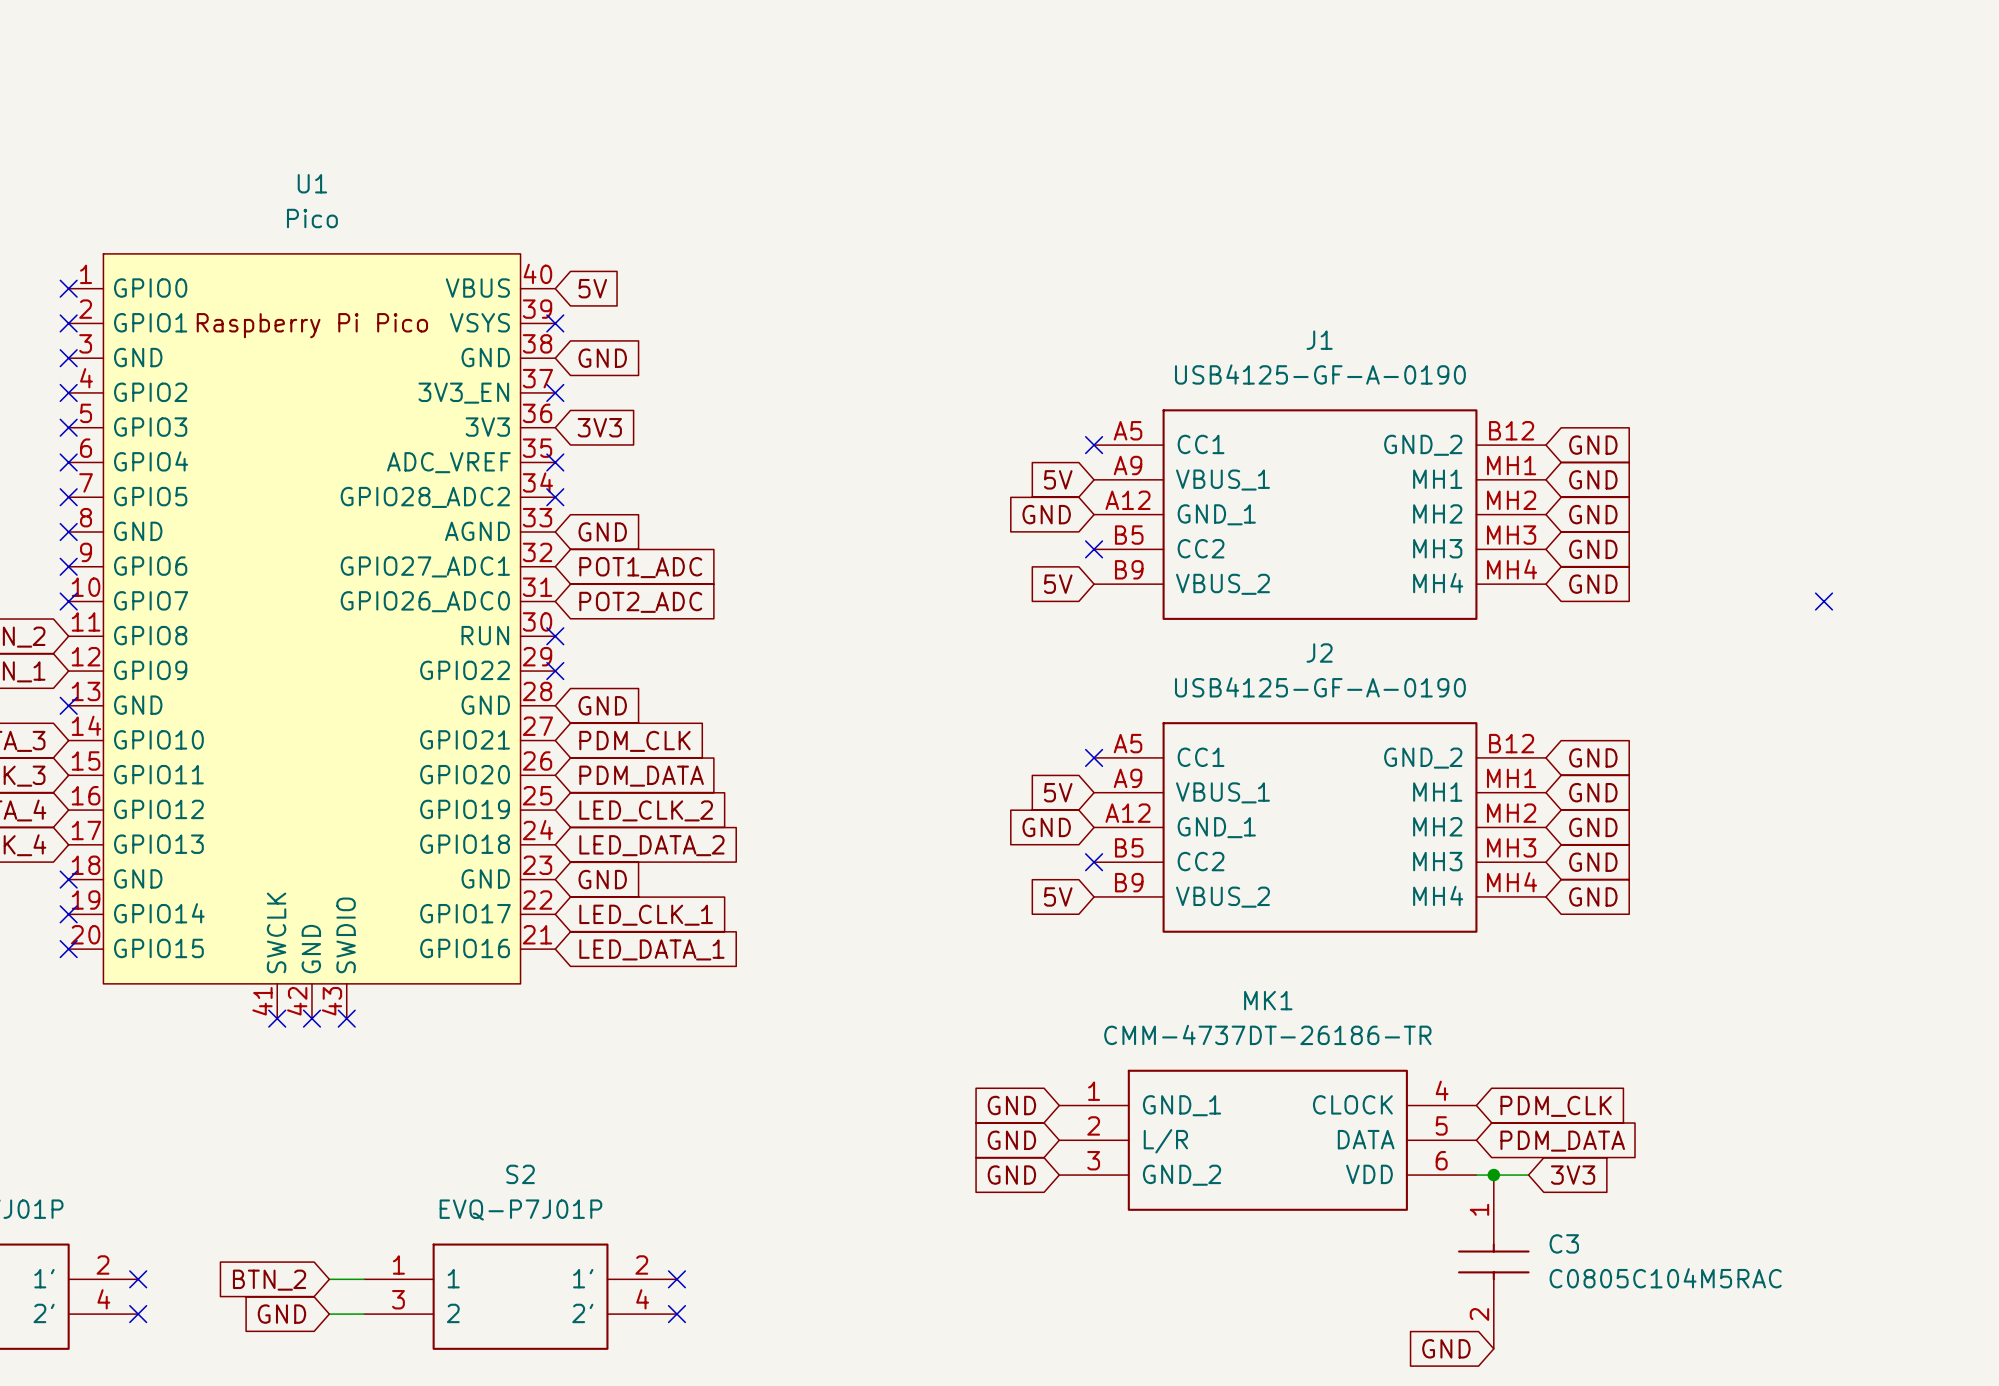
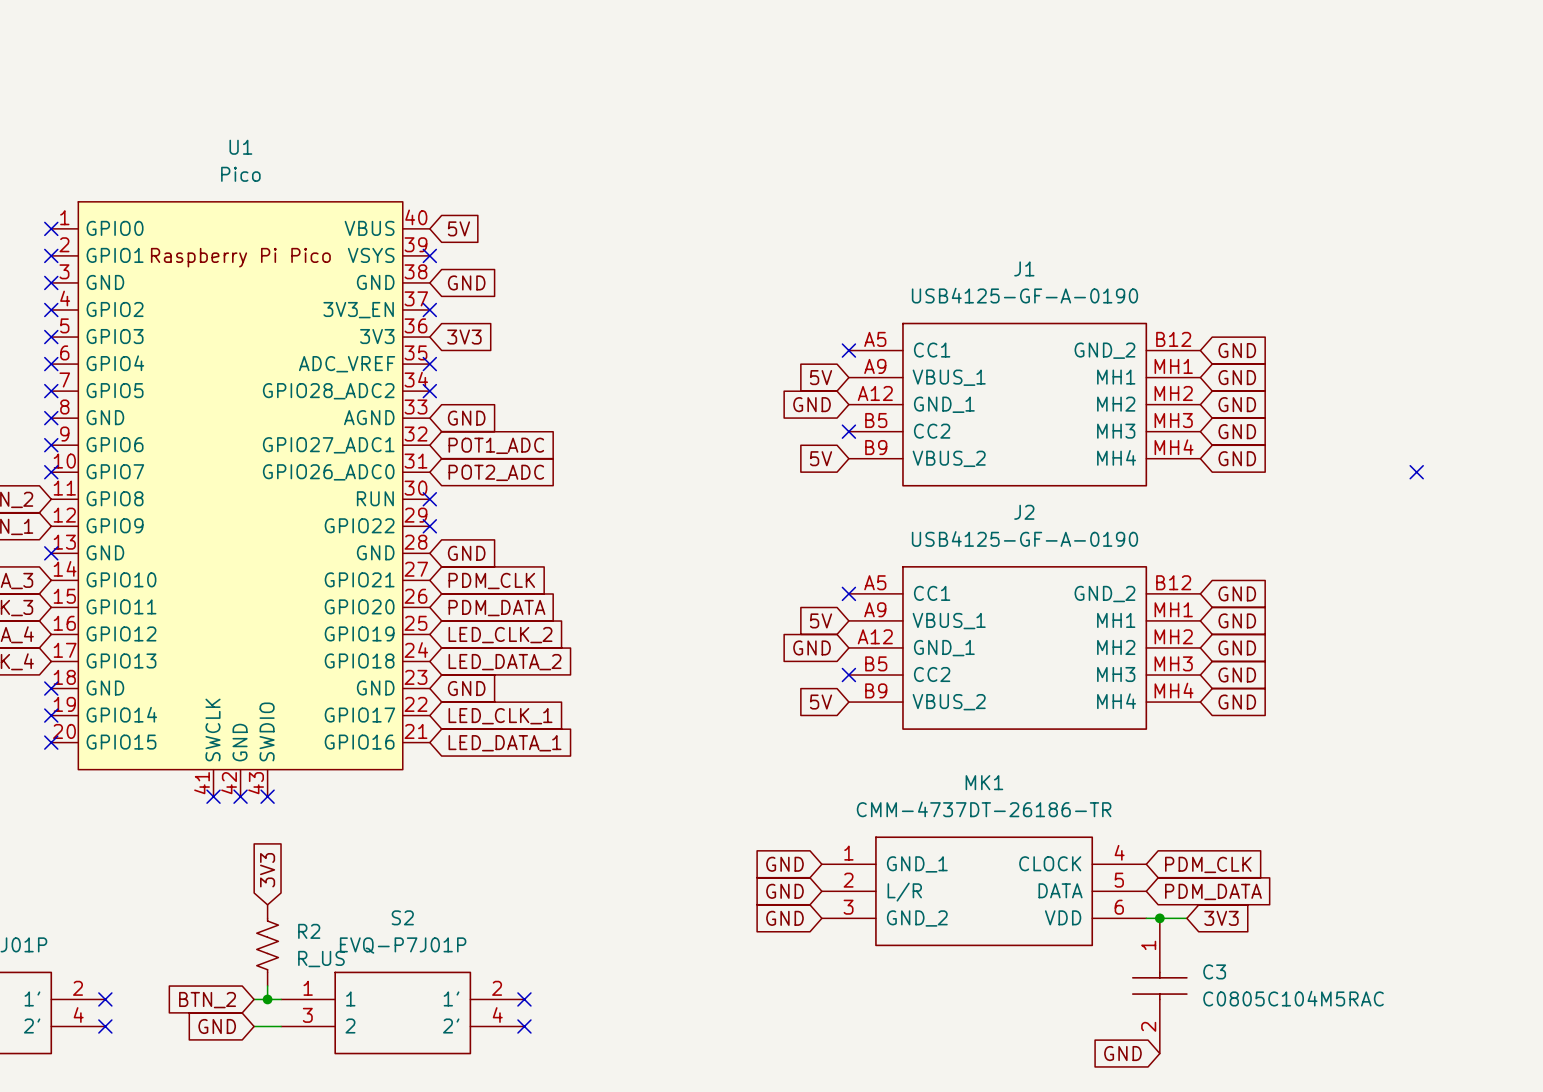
global label: none -> 3V3 (267, 870)
R2: none -> R_US (267, 945)
wire: none -> (267, 985) (267, 999)
junction: none -> (267, 999)

